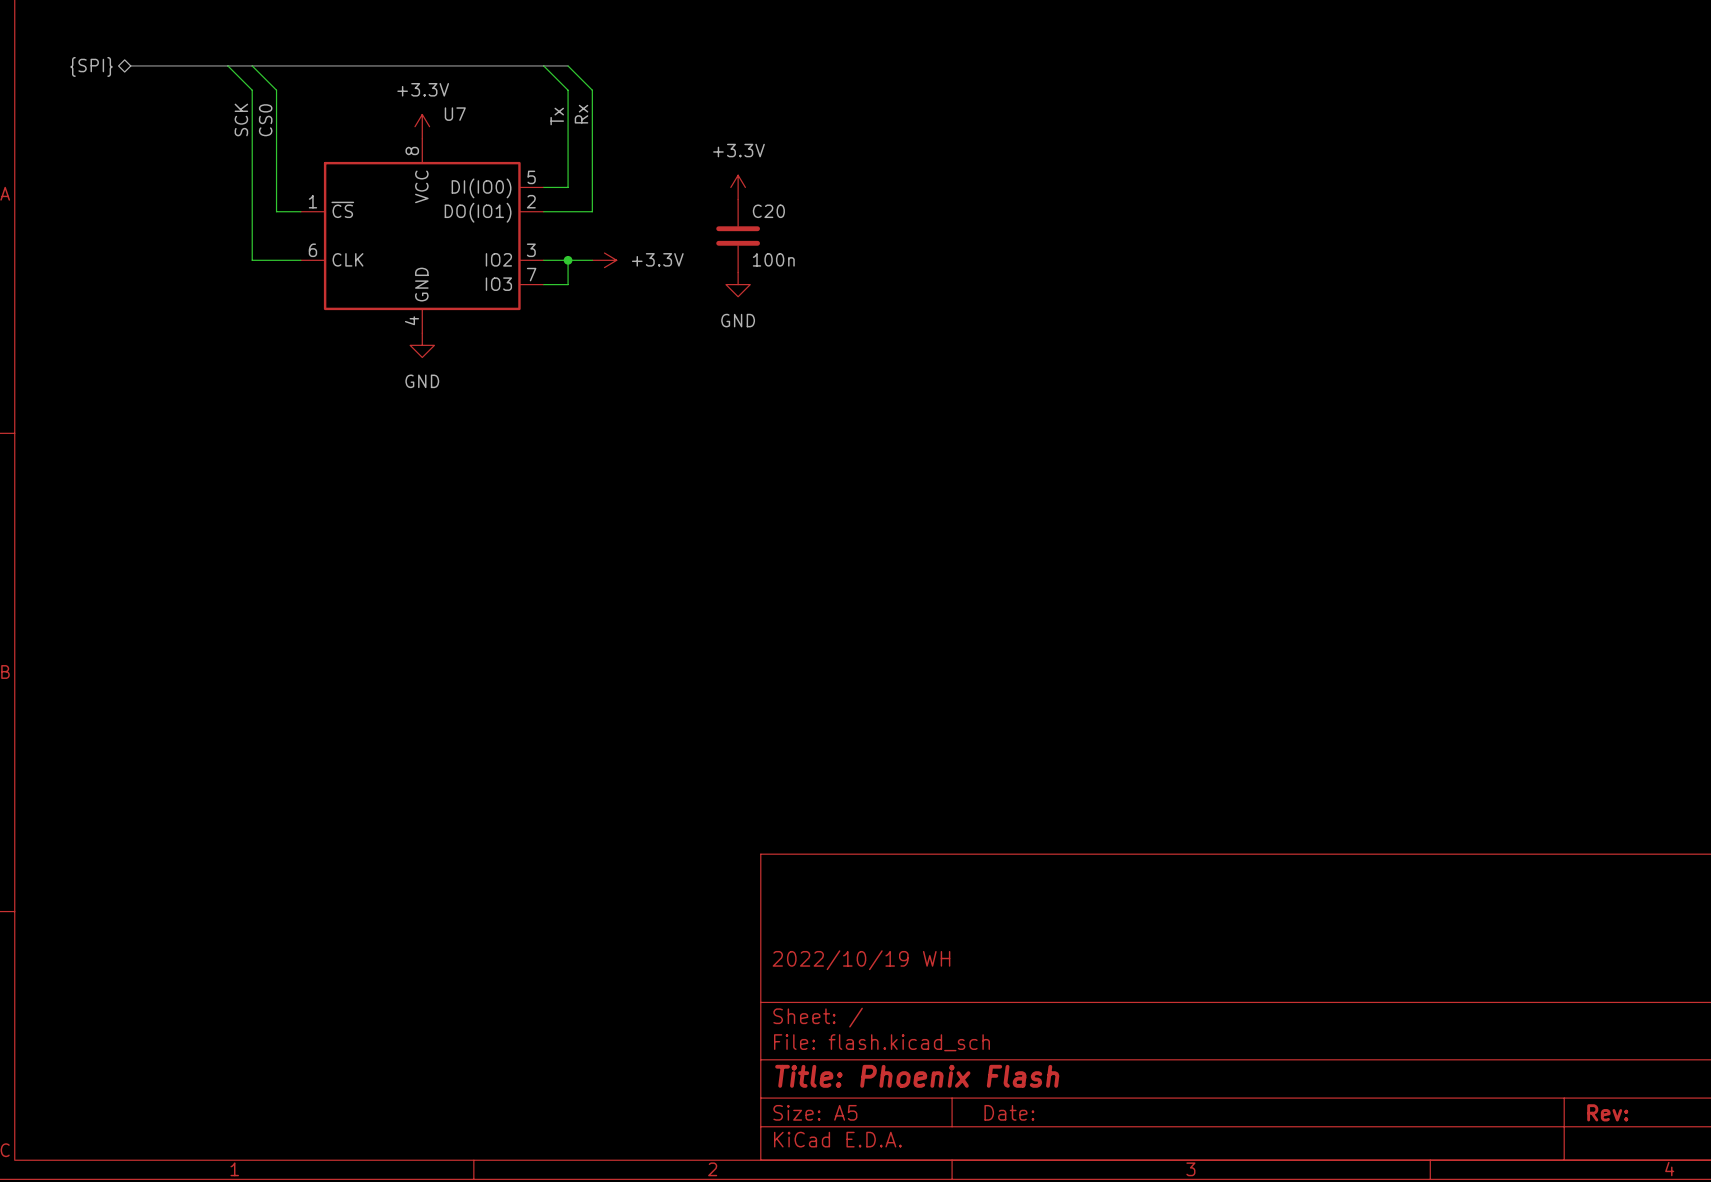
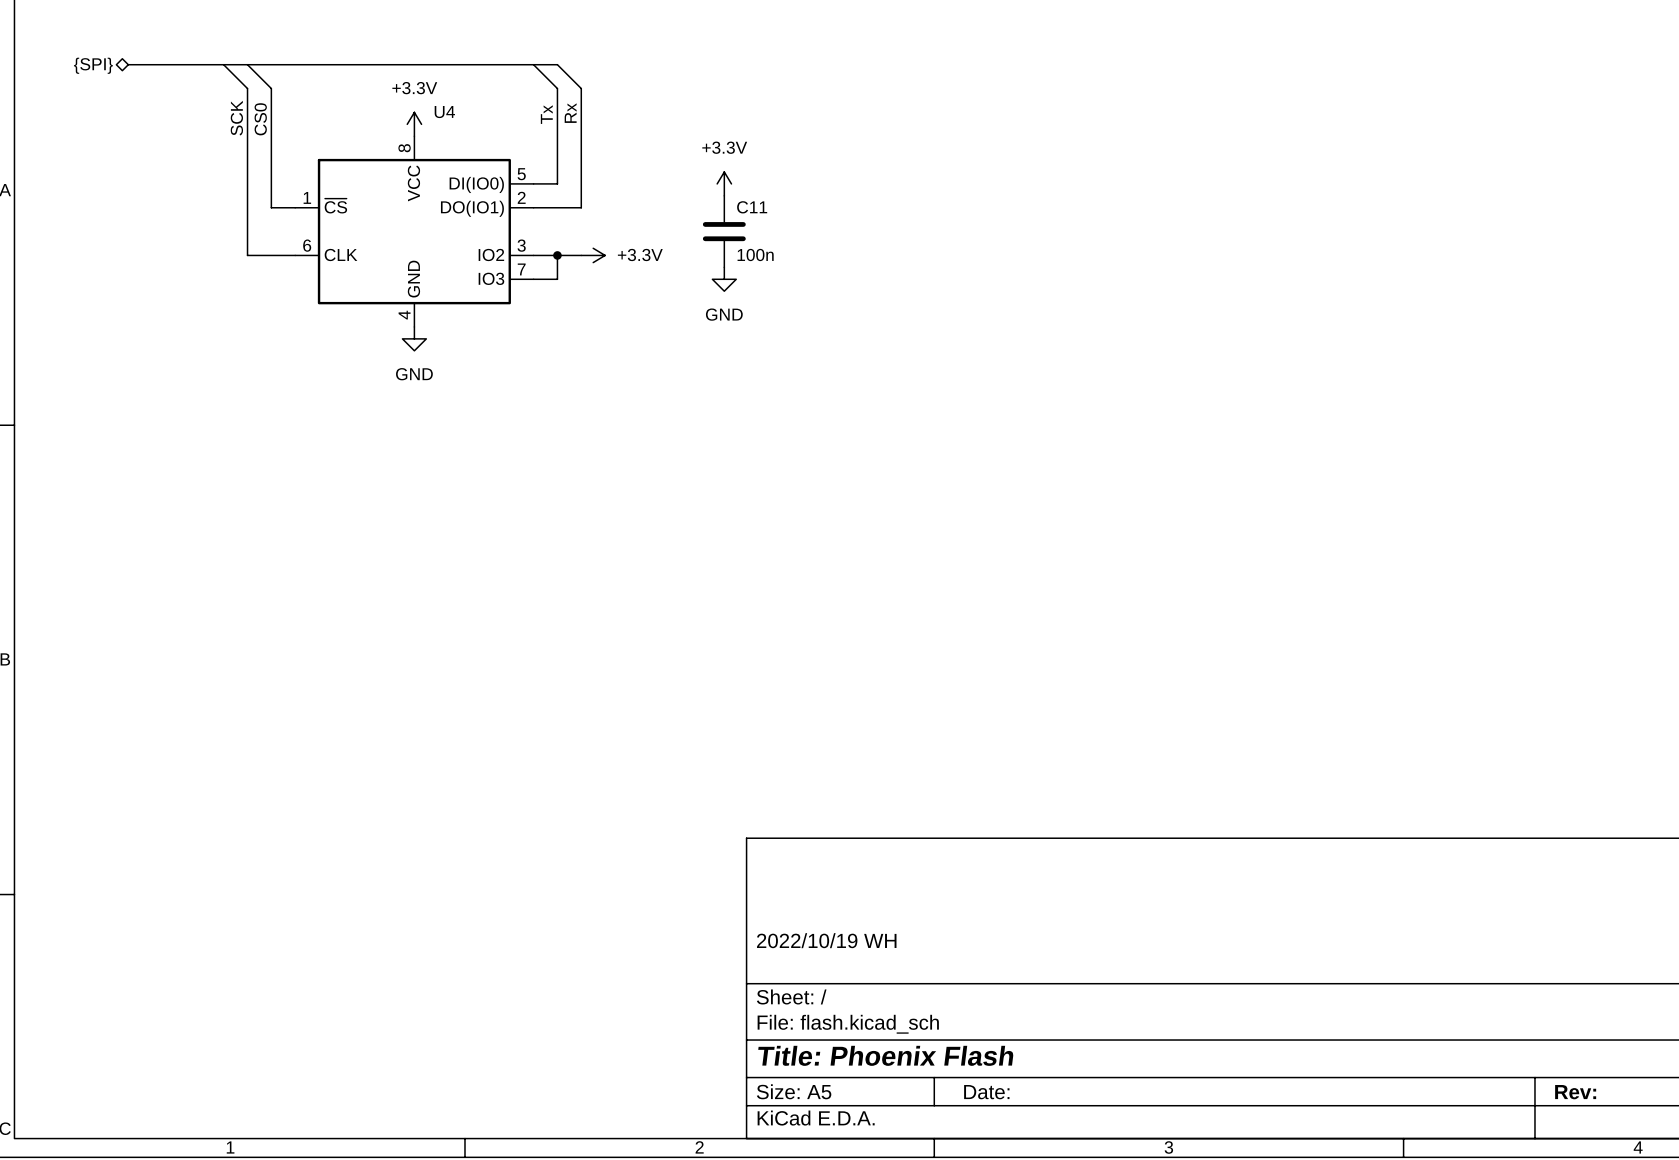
U7 name: U7 (455, 114) -> U4 (444, 112)
C20 name: C20 (768, 211) -> C11 (752, 207)

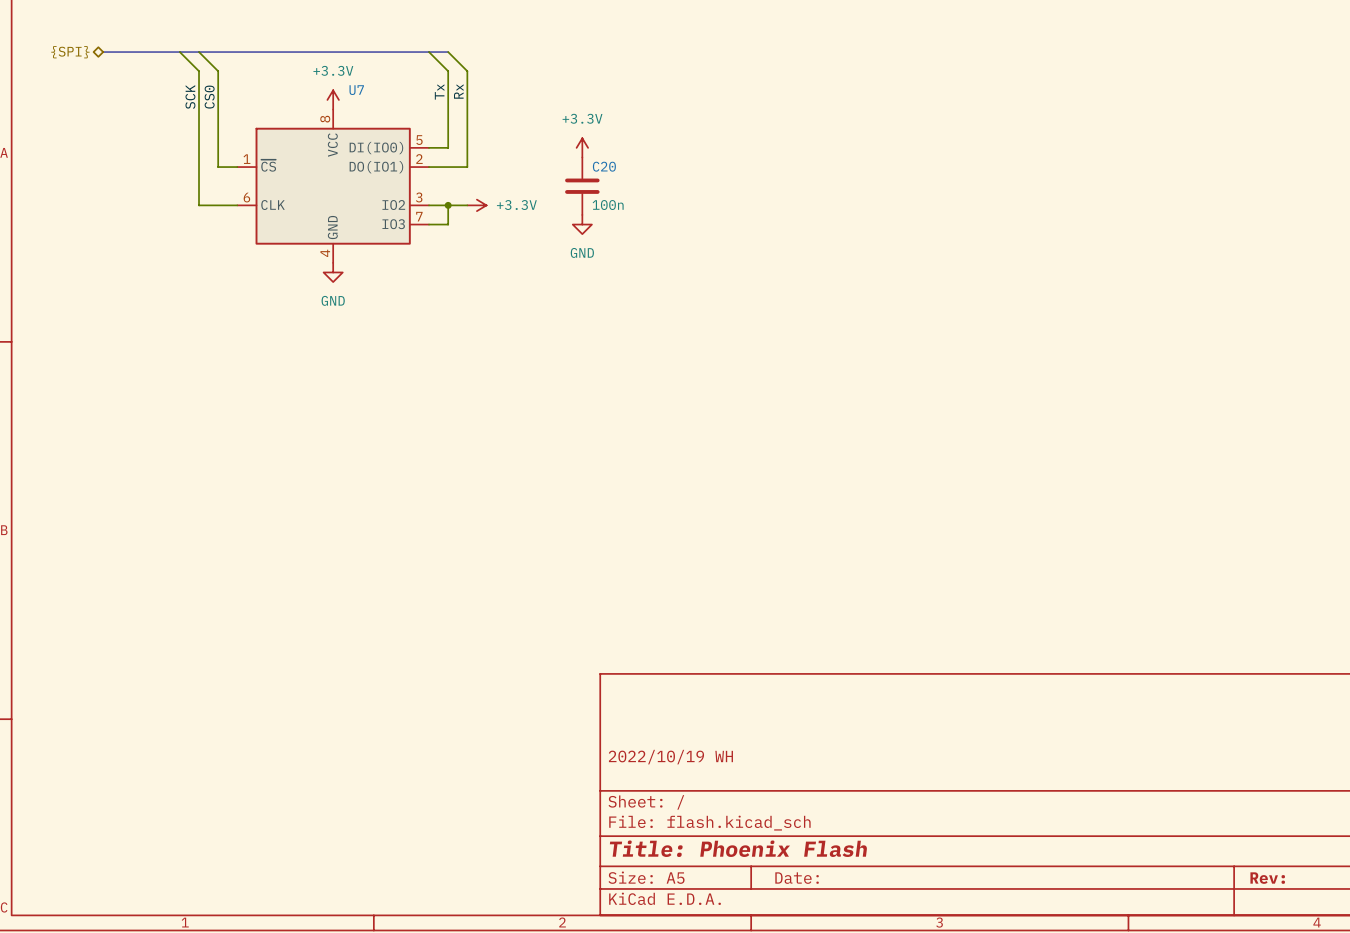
U4 name: U4 (444, 112) -> U7 (356, 90)
C11 name: C11 (752, 207) -> C20 (604, 166)

